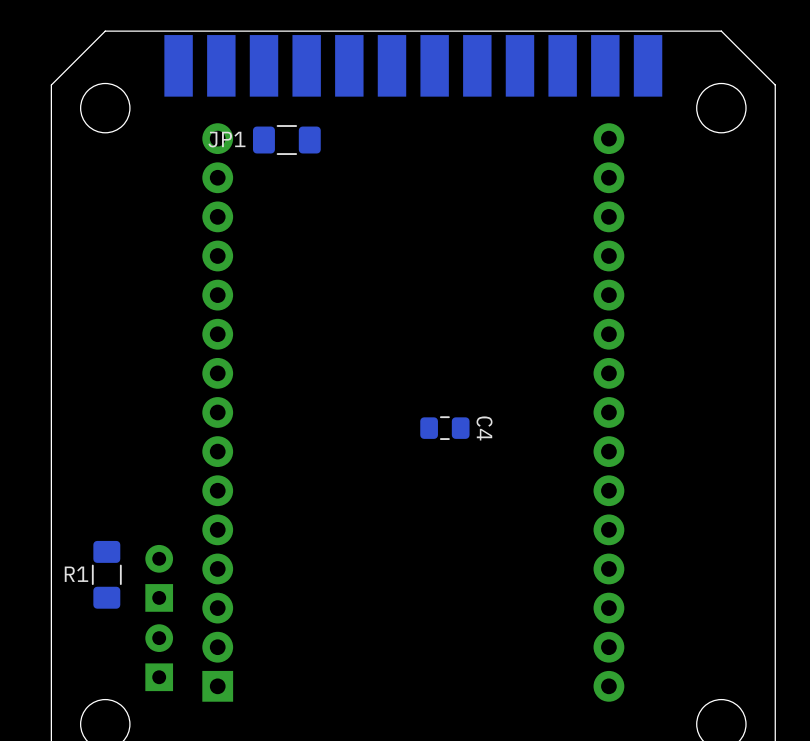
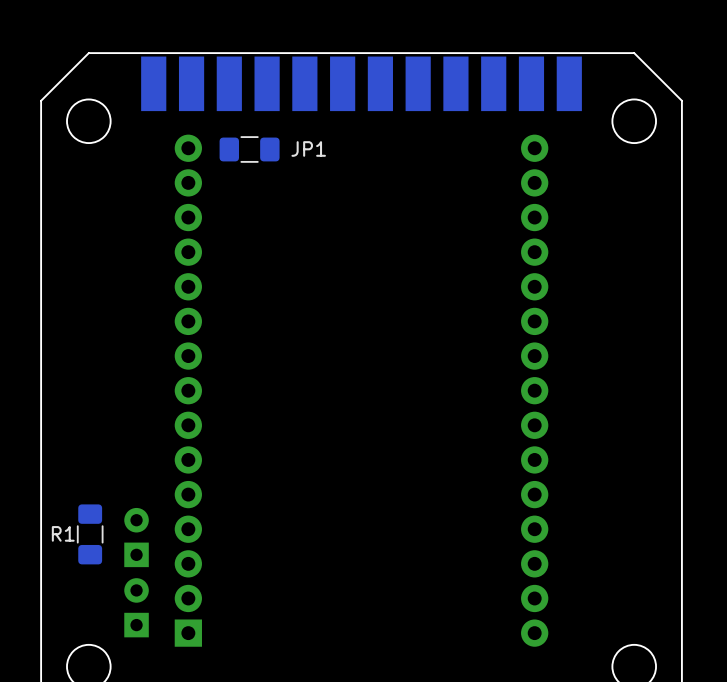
JP1 name position: JP1 (226, 139) -> JP1 (308, 148)
C4: (444, 428) -> none

